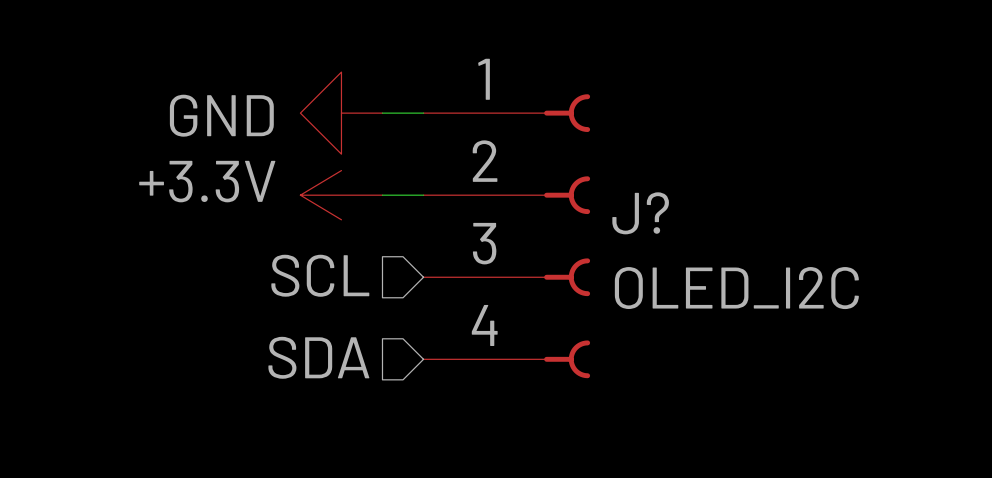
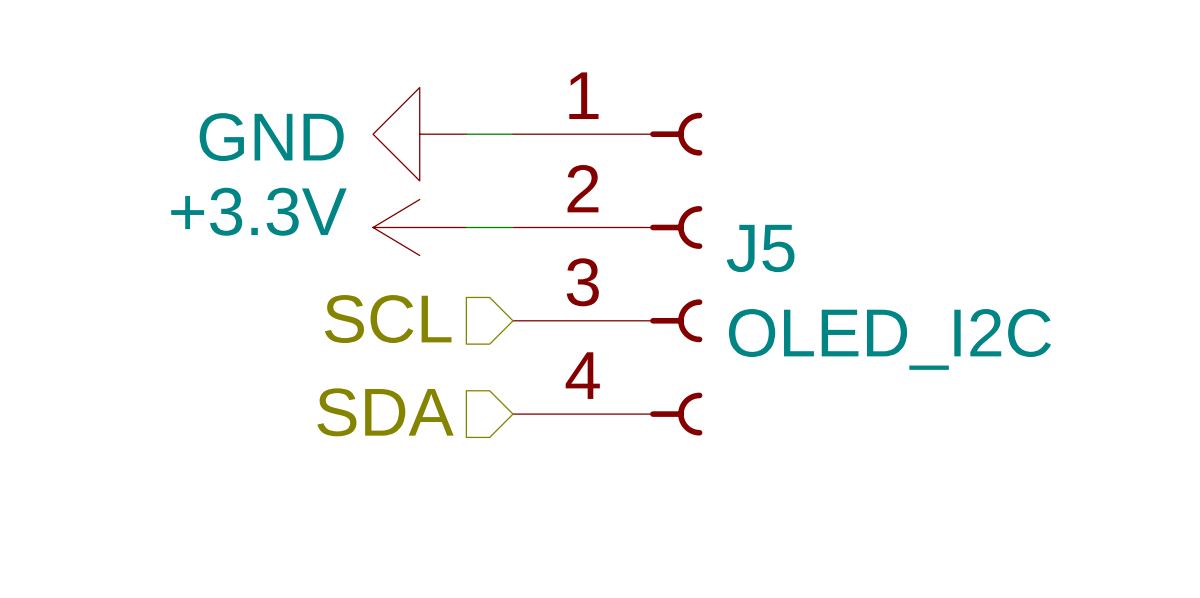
J? name: J? (640, 213) -> J5 (760, 248)

